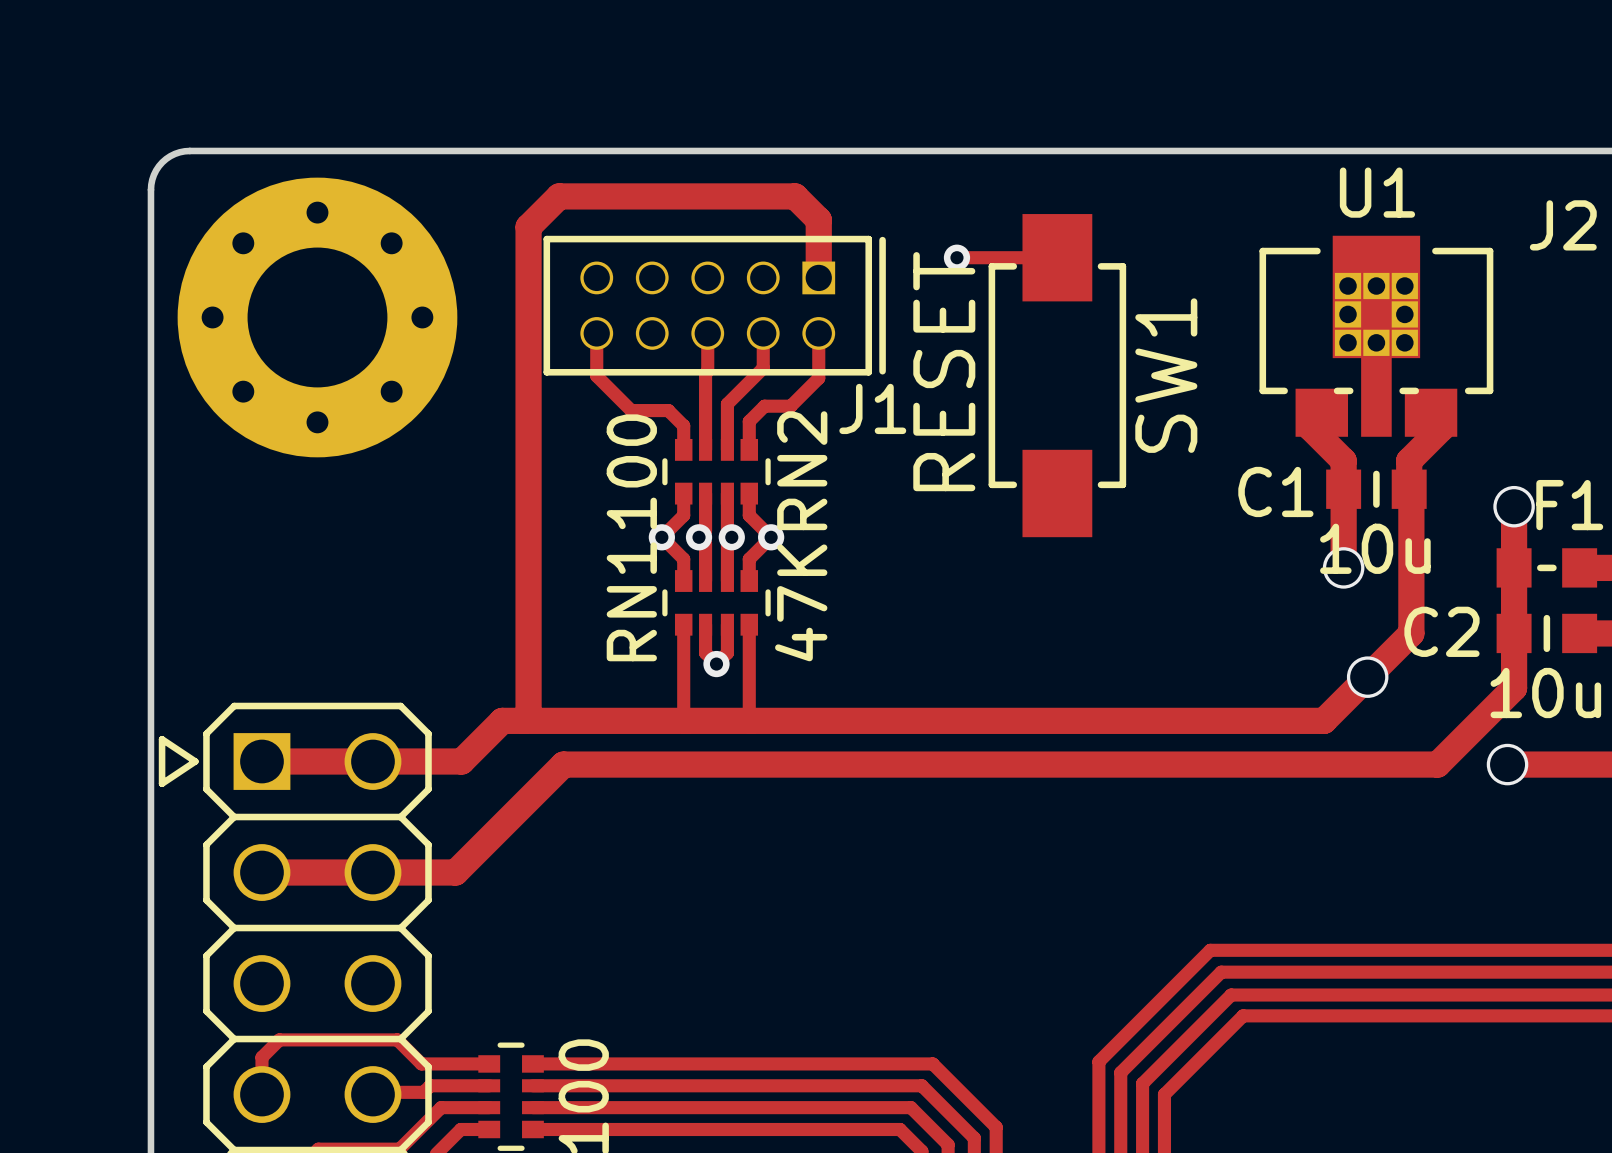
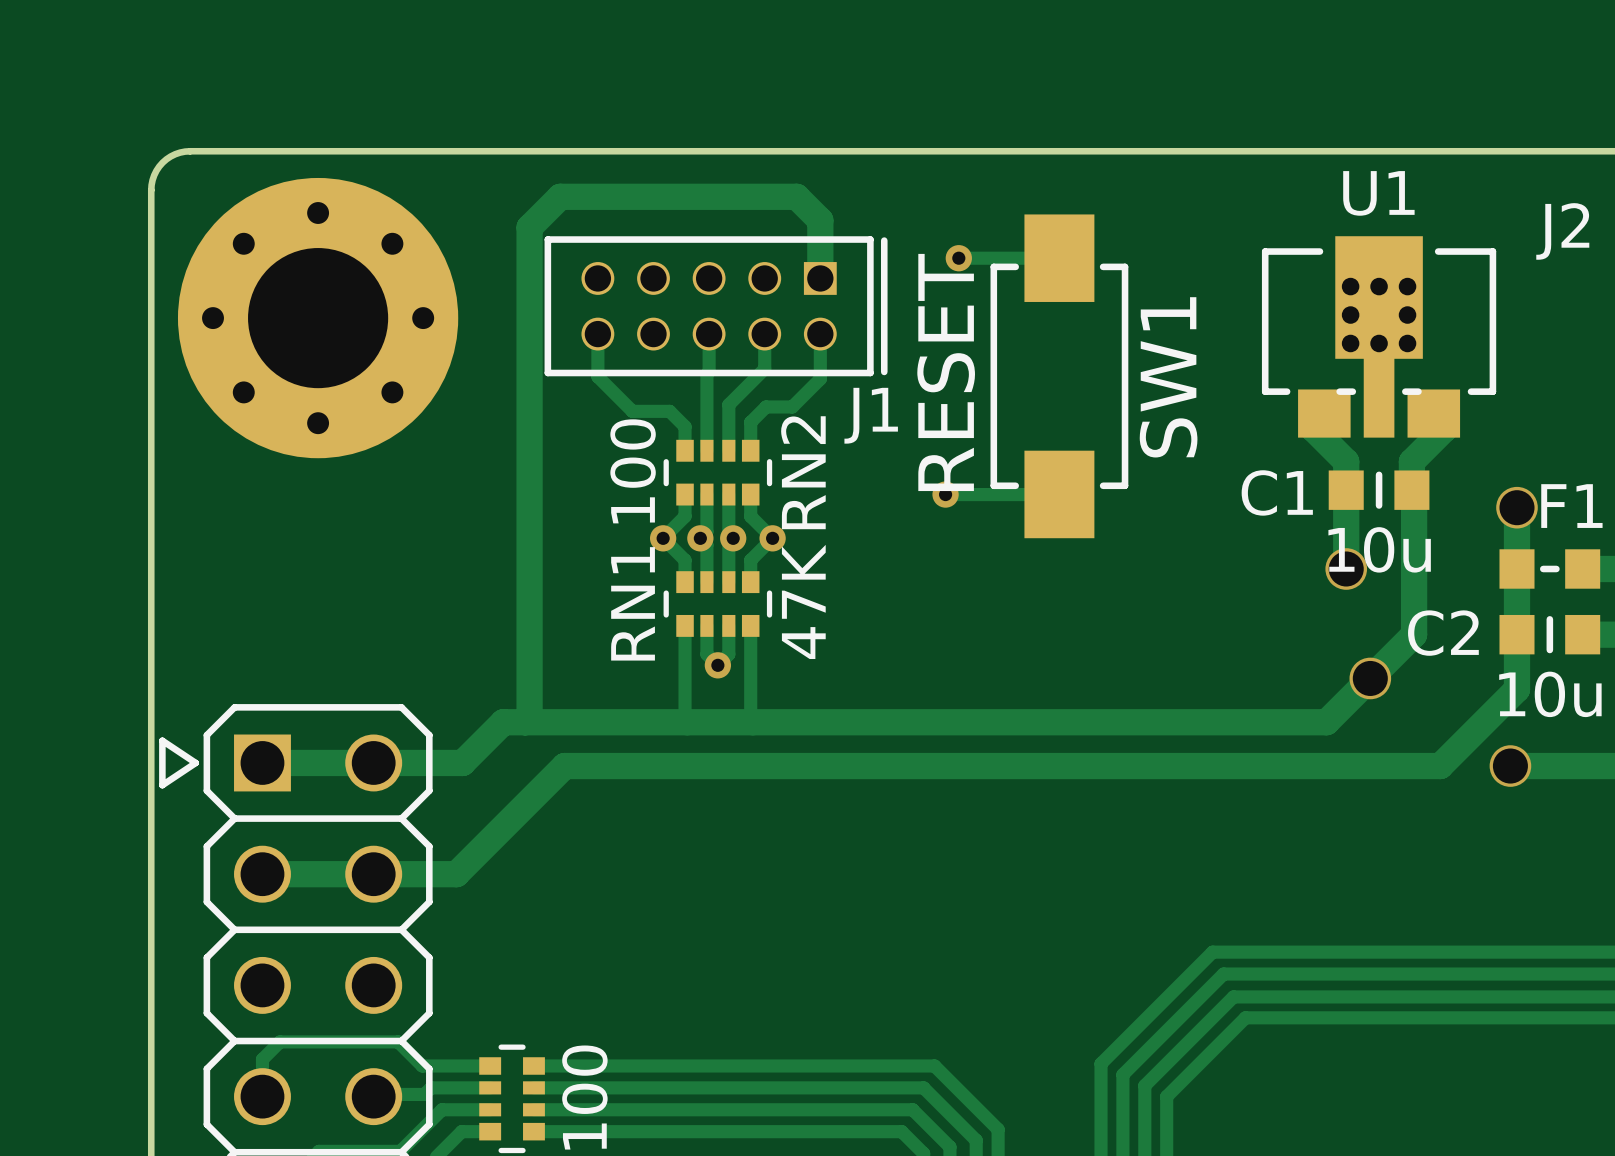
track: none -> (945, 494) (1059, 494)
via: none -> (945, 494)

